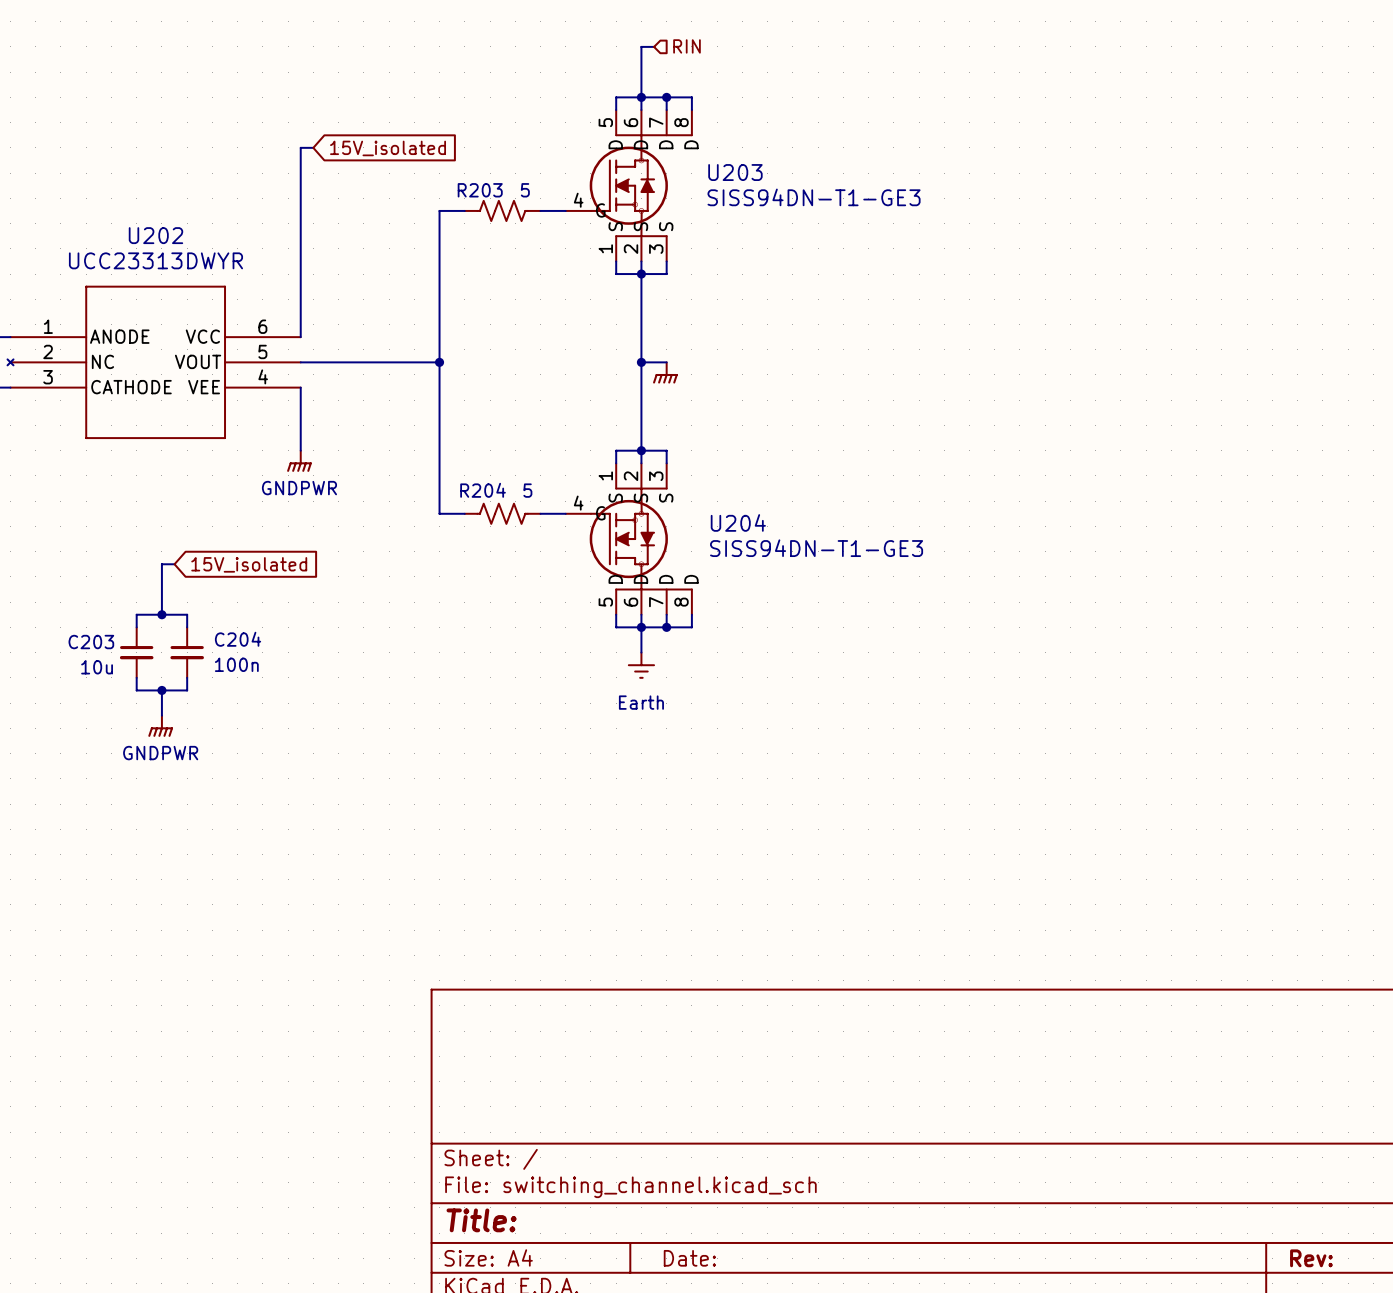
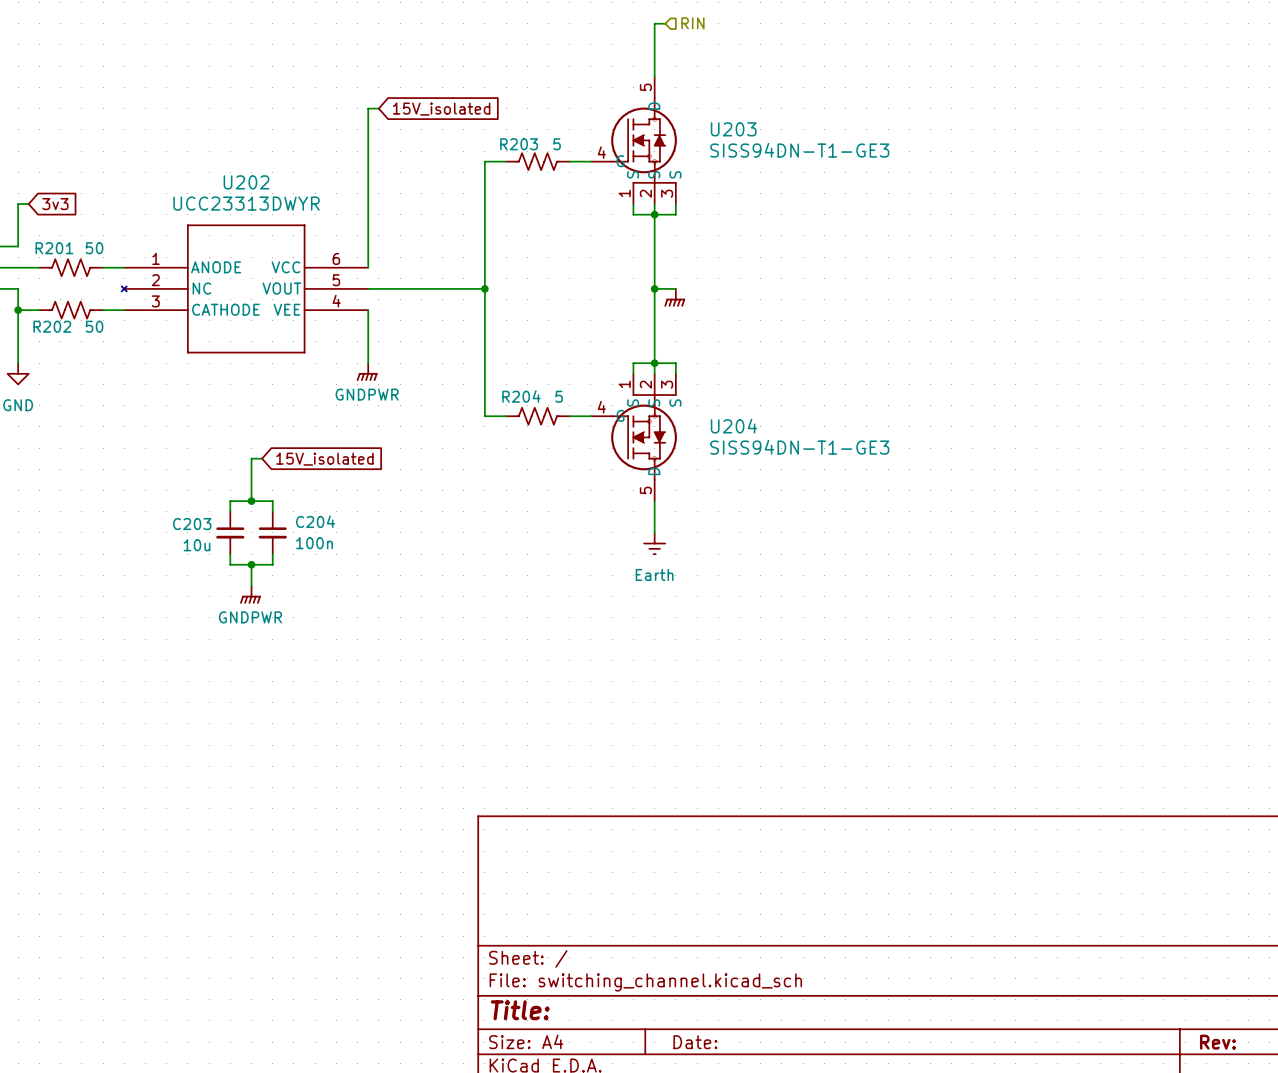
junction: (641, 97) -> none
wire: (666, 97) (666, 110) -> none
junction: (666, 97) -> none
U203 symbol: [565, 110, 693, 262] -> [590, 76, 677, 205]
wire: (616, 110) (616, 97) (691, 97) (691, 110) -> none
U204 symbol: [565, 463, 693, 615] -> [590, 373, 677, 502]
wire: (616, 614) (616, 627) (691, 627) (691, 614) -> none
wire: (666, 614) (666, 627) -> none
junction: (641, 627) -> none
junction: (666, 627) -> none

